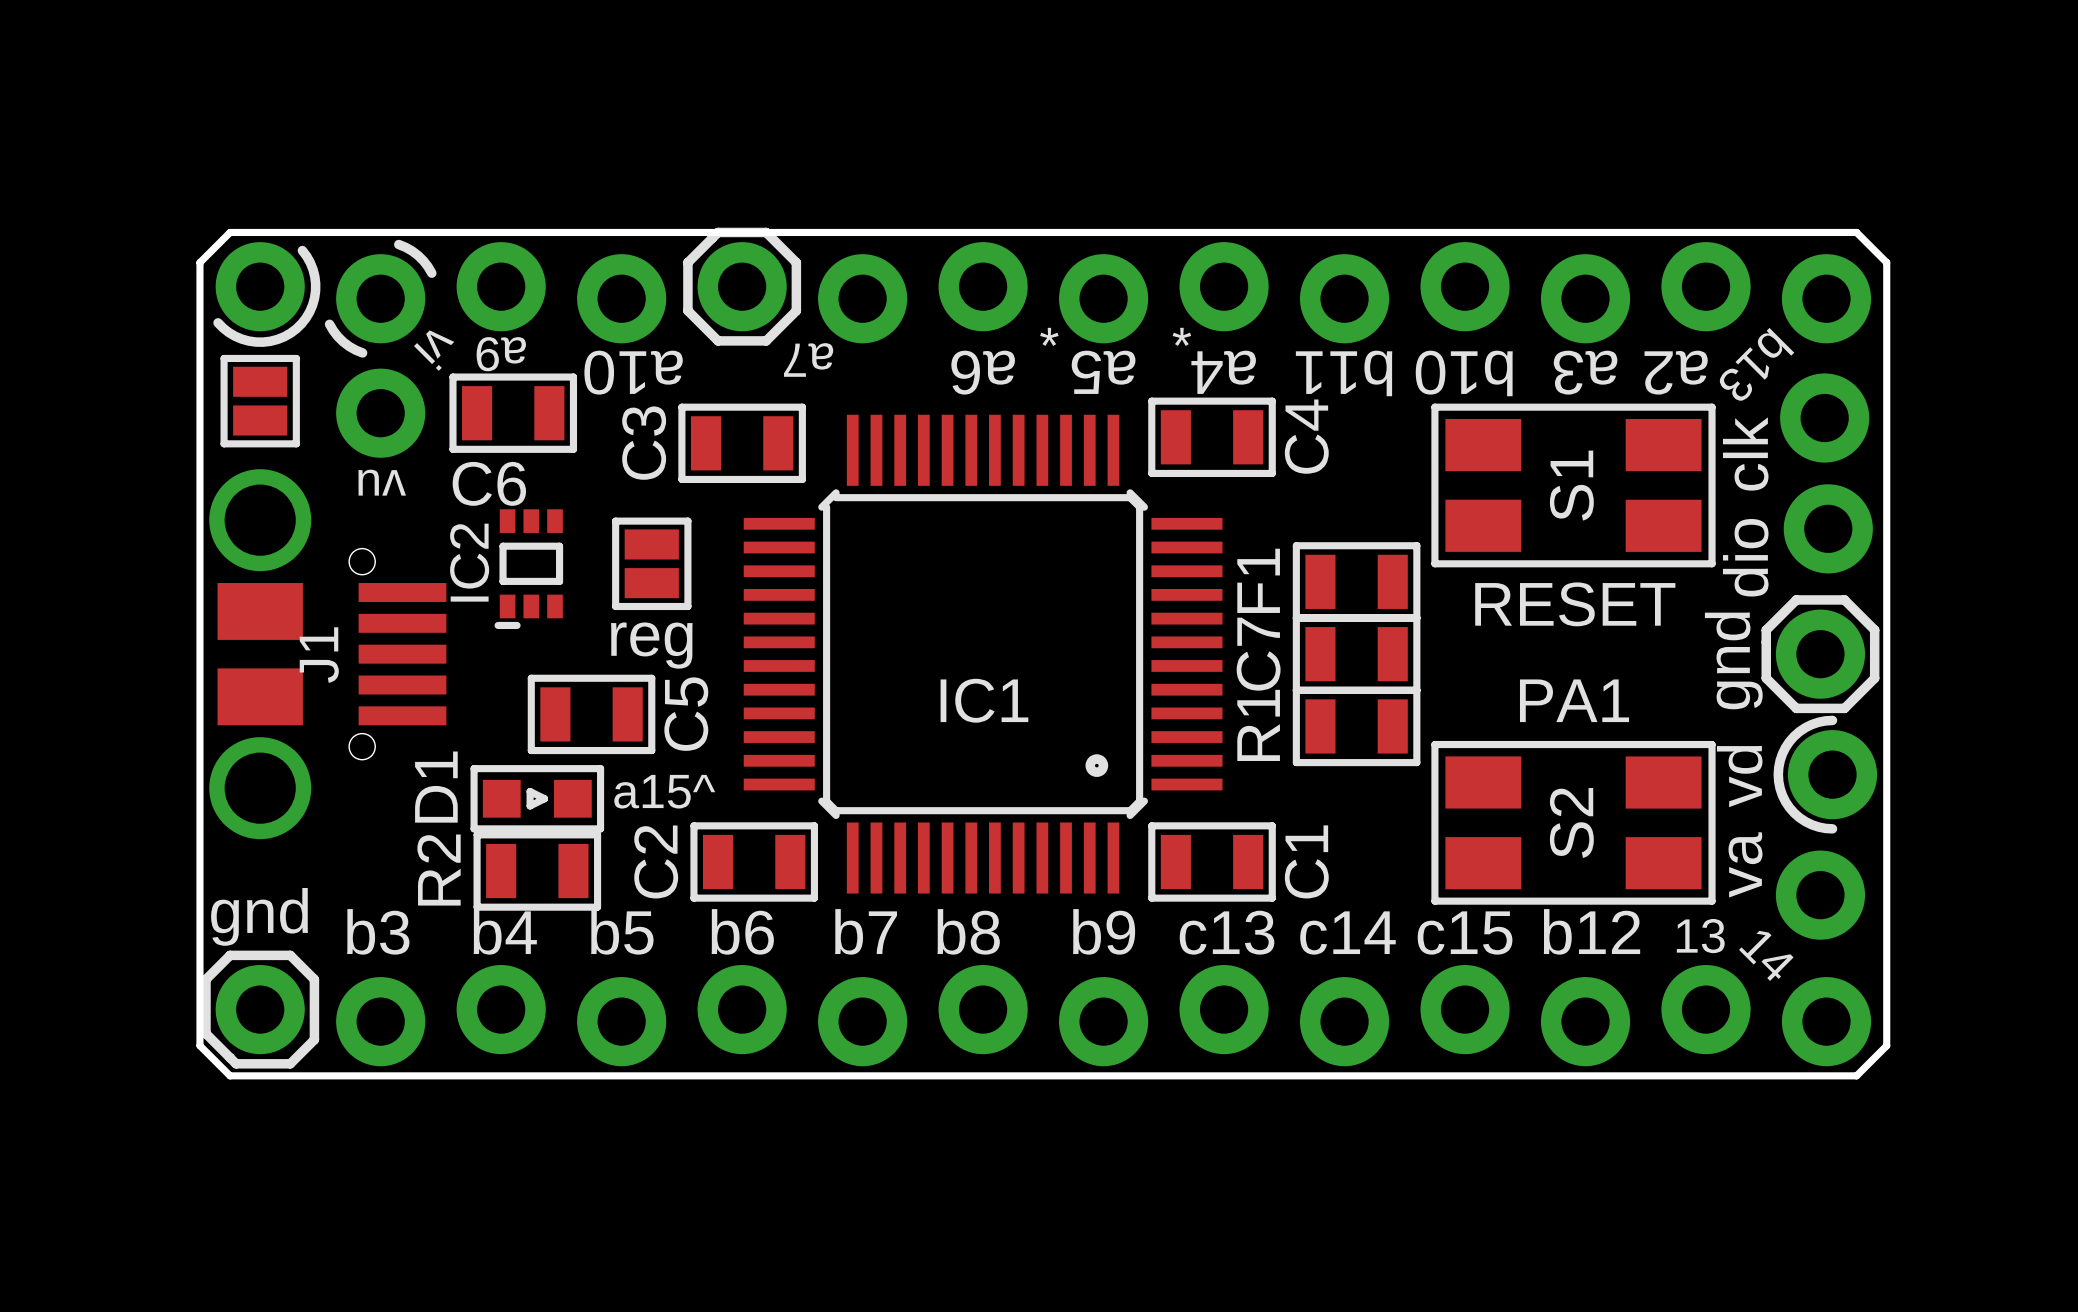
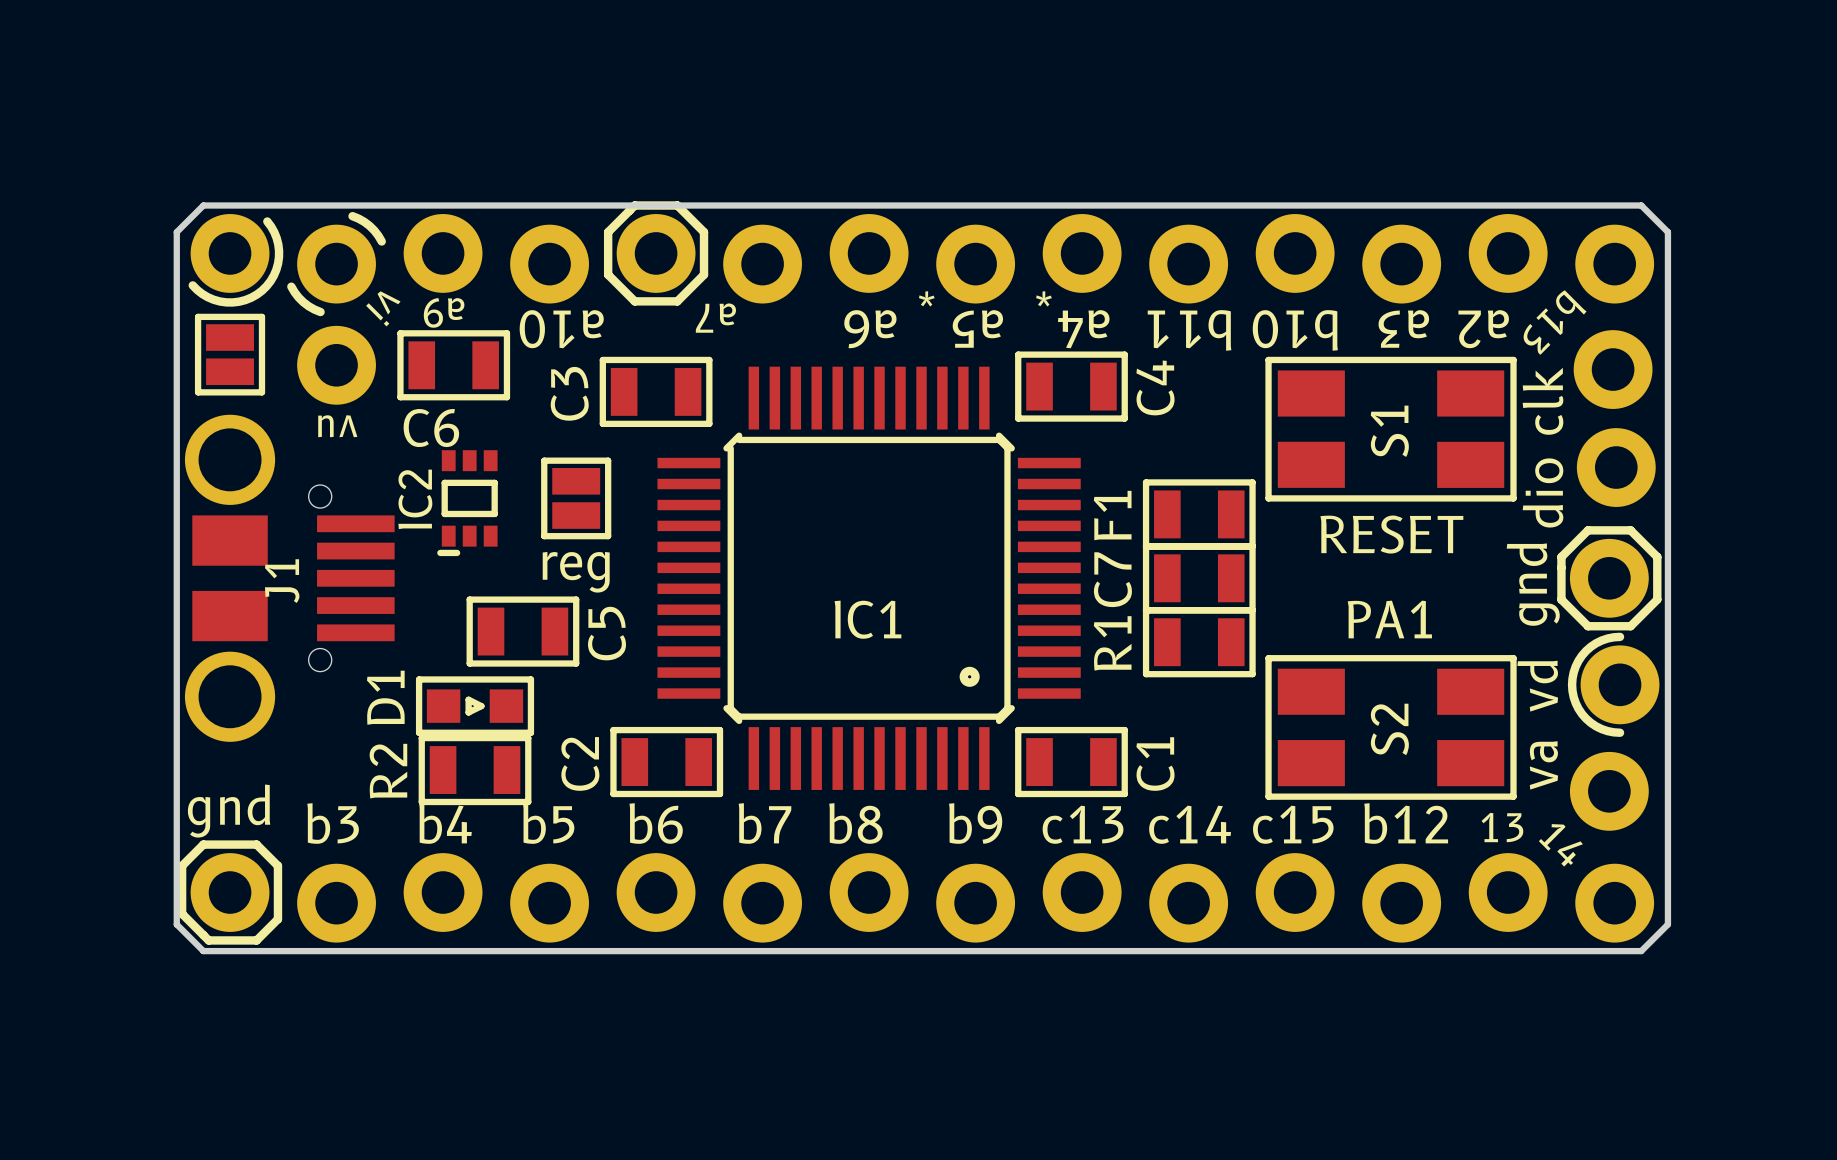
text: a15^ (664, 791) -> none

